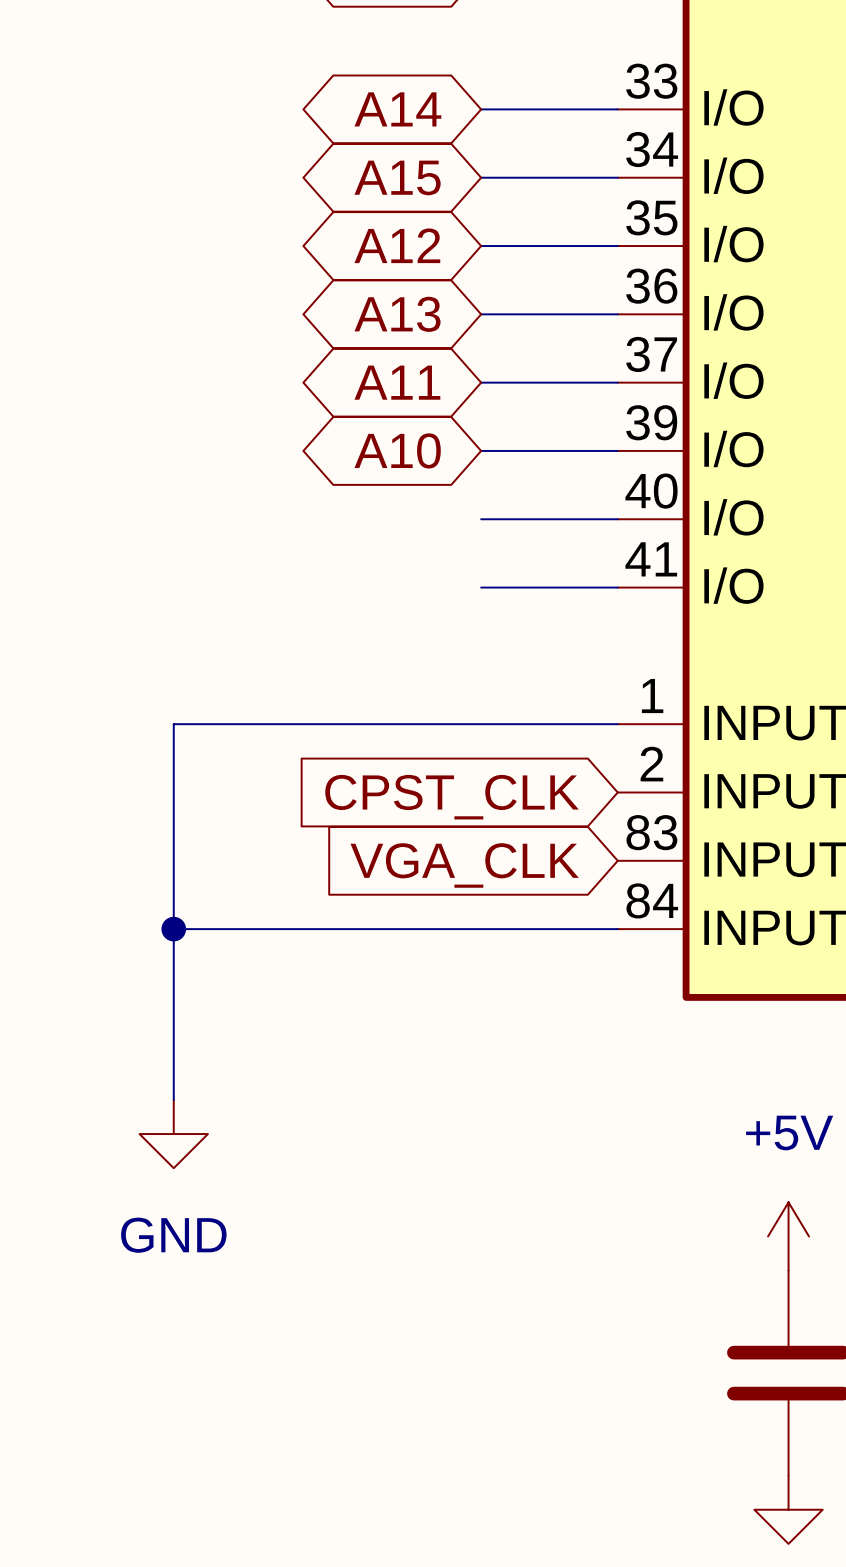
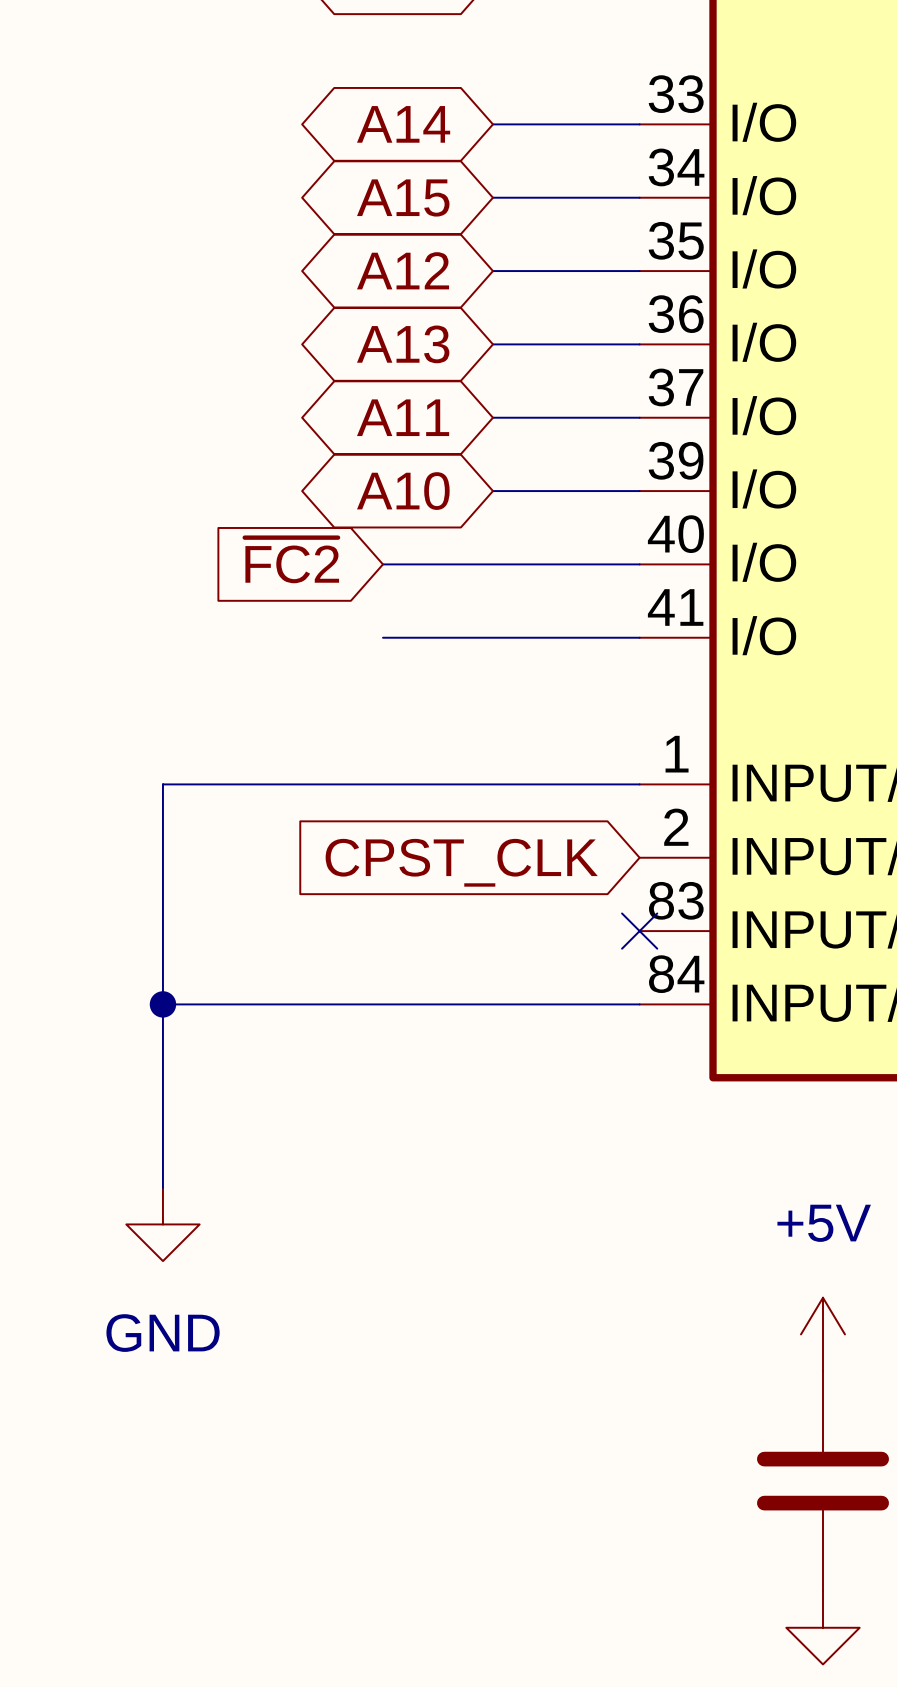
global label: none -> ~{FC2} (291, 560)
wire: none -> (382, 564) (492, 564)
wire: none -> (382, 637) (492, 637)
no-connect mark: none -> (639, 931)
global label: VGA_CLK (464, 865) -> none

